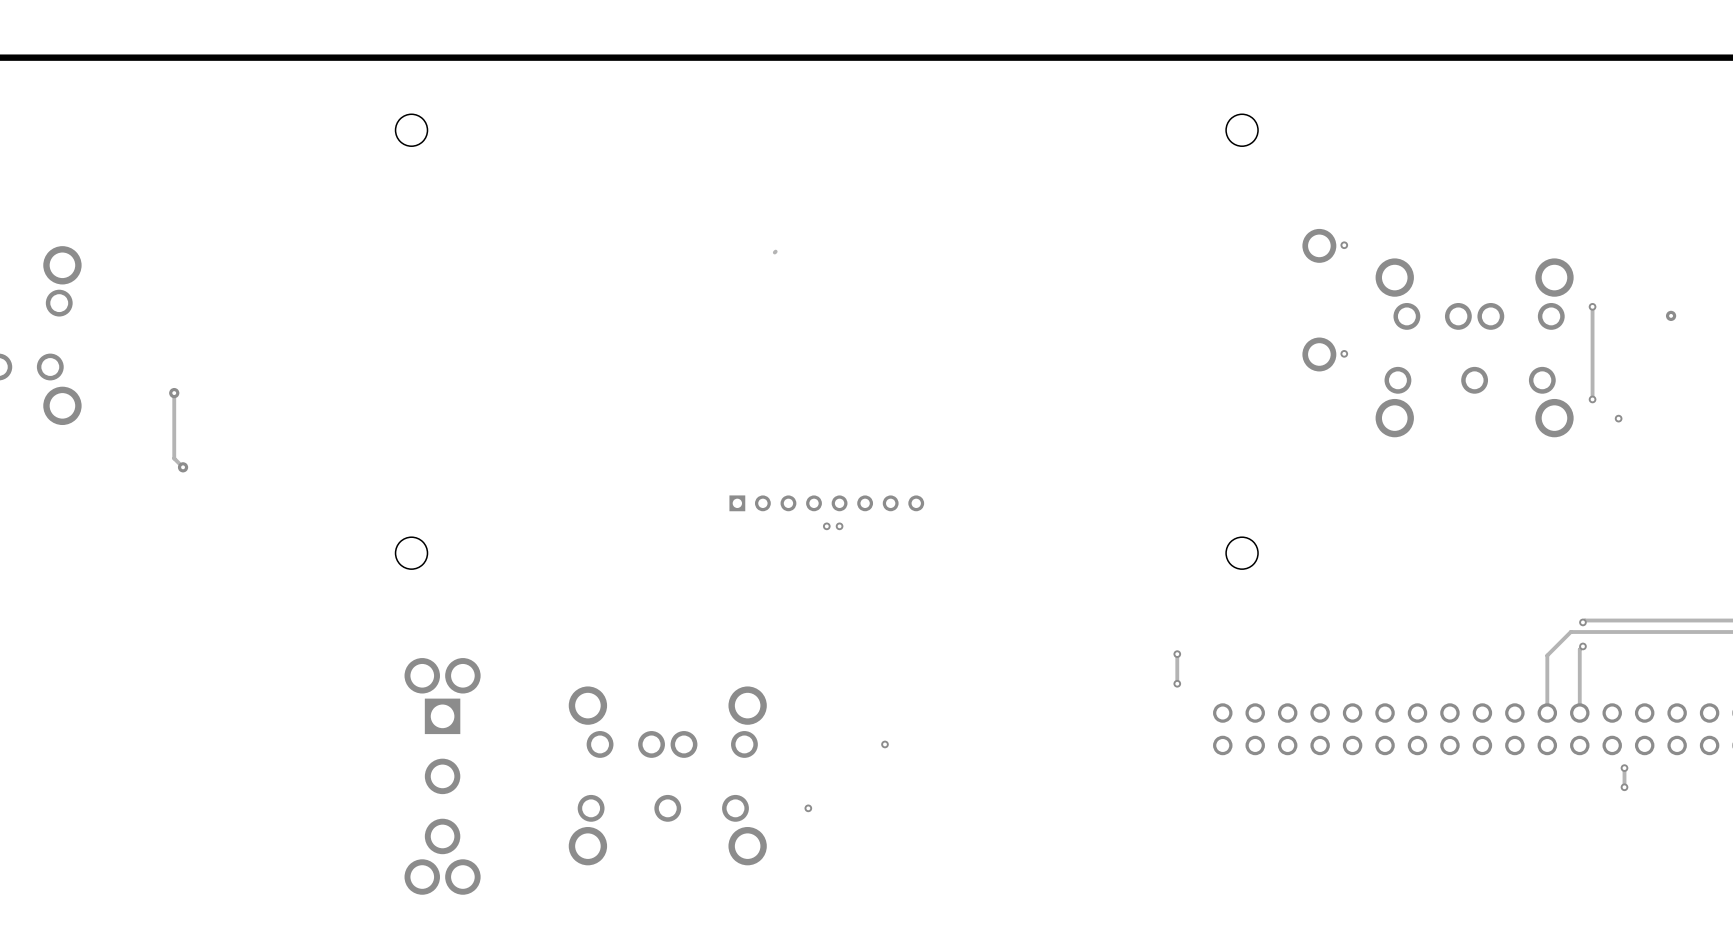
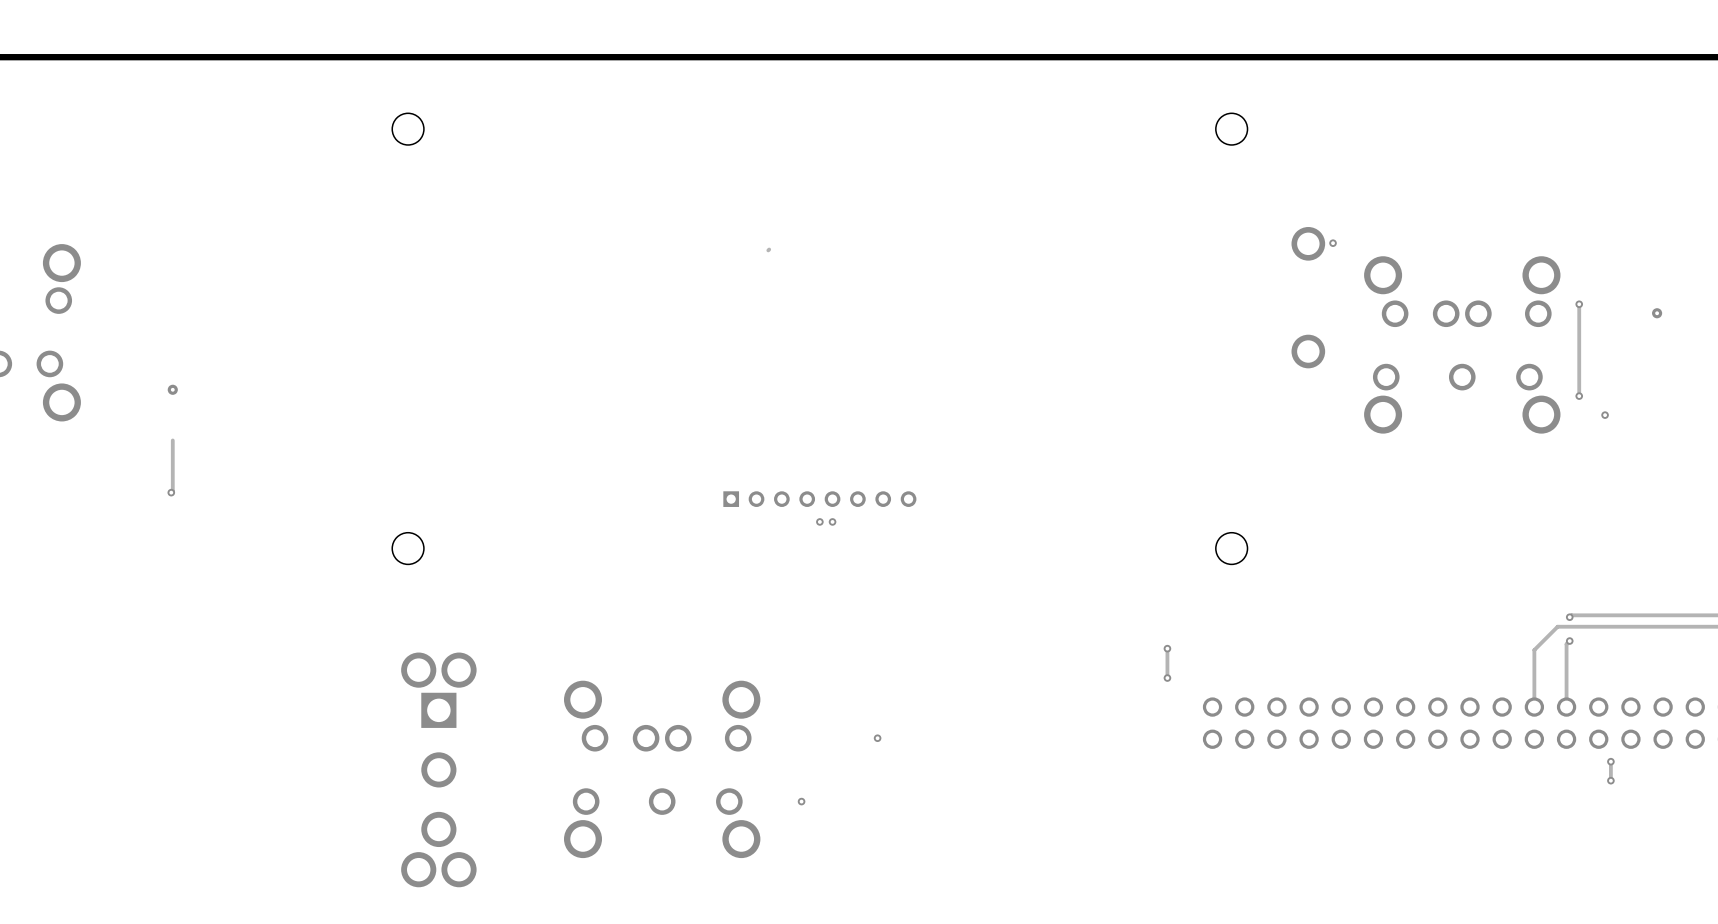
via: (1344, 353) -> none
track: (174, 393) (174, 444) -> none
track: (174, 458) (183, 467) -> (172, 454) (171, 492)
via: (183, 467) -> none
via: none -> (171, 492)

